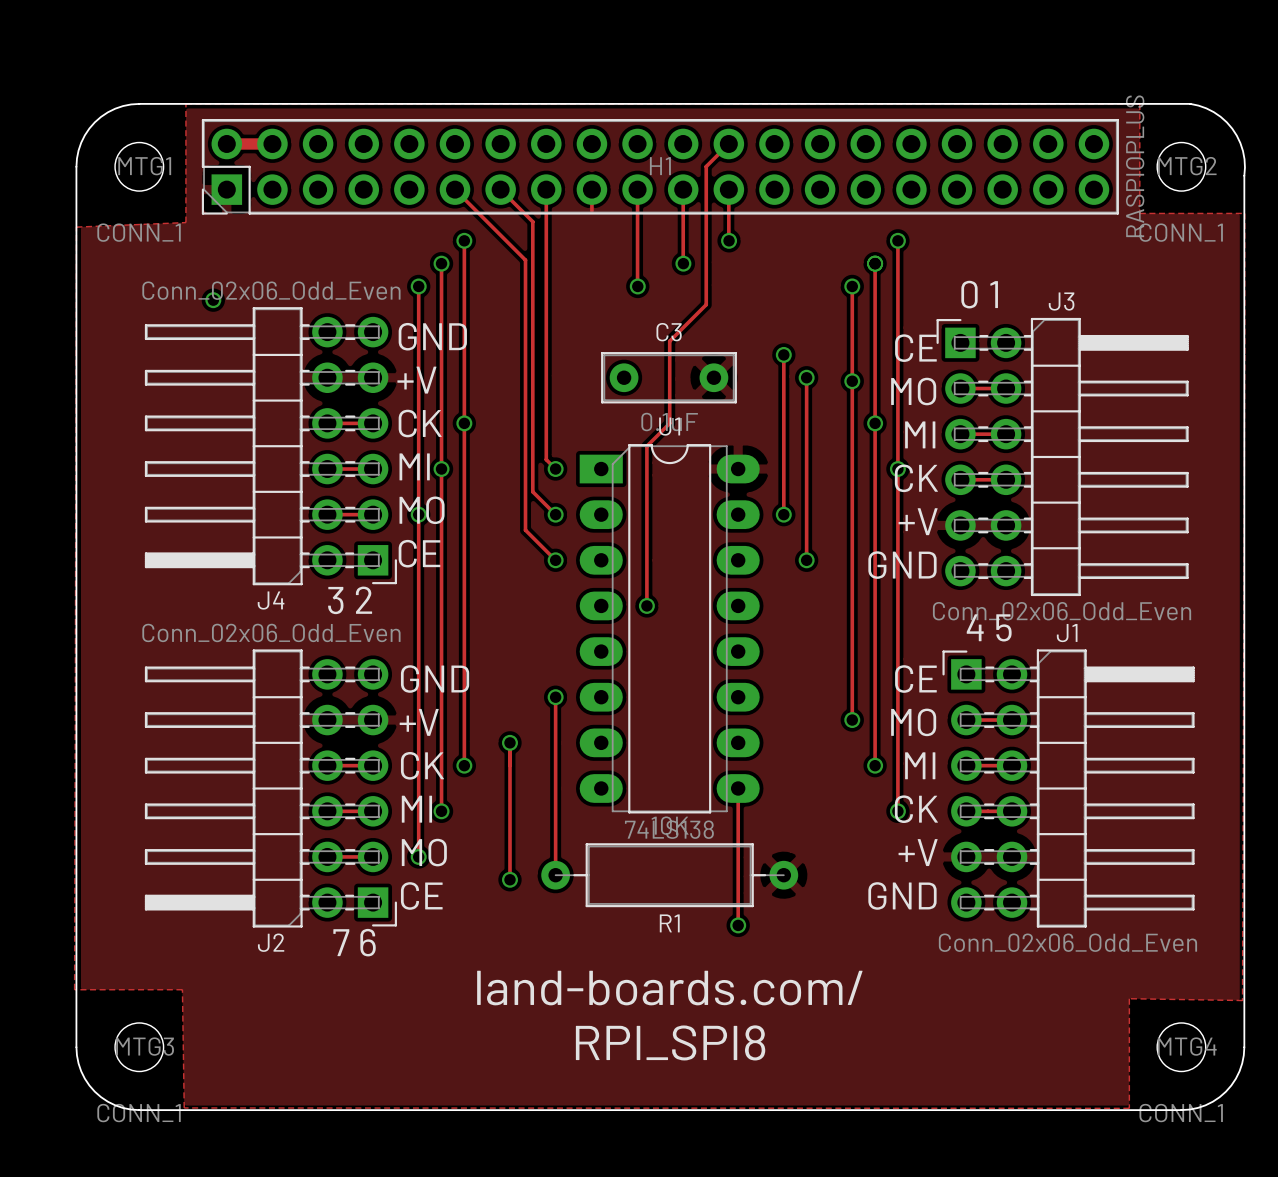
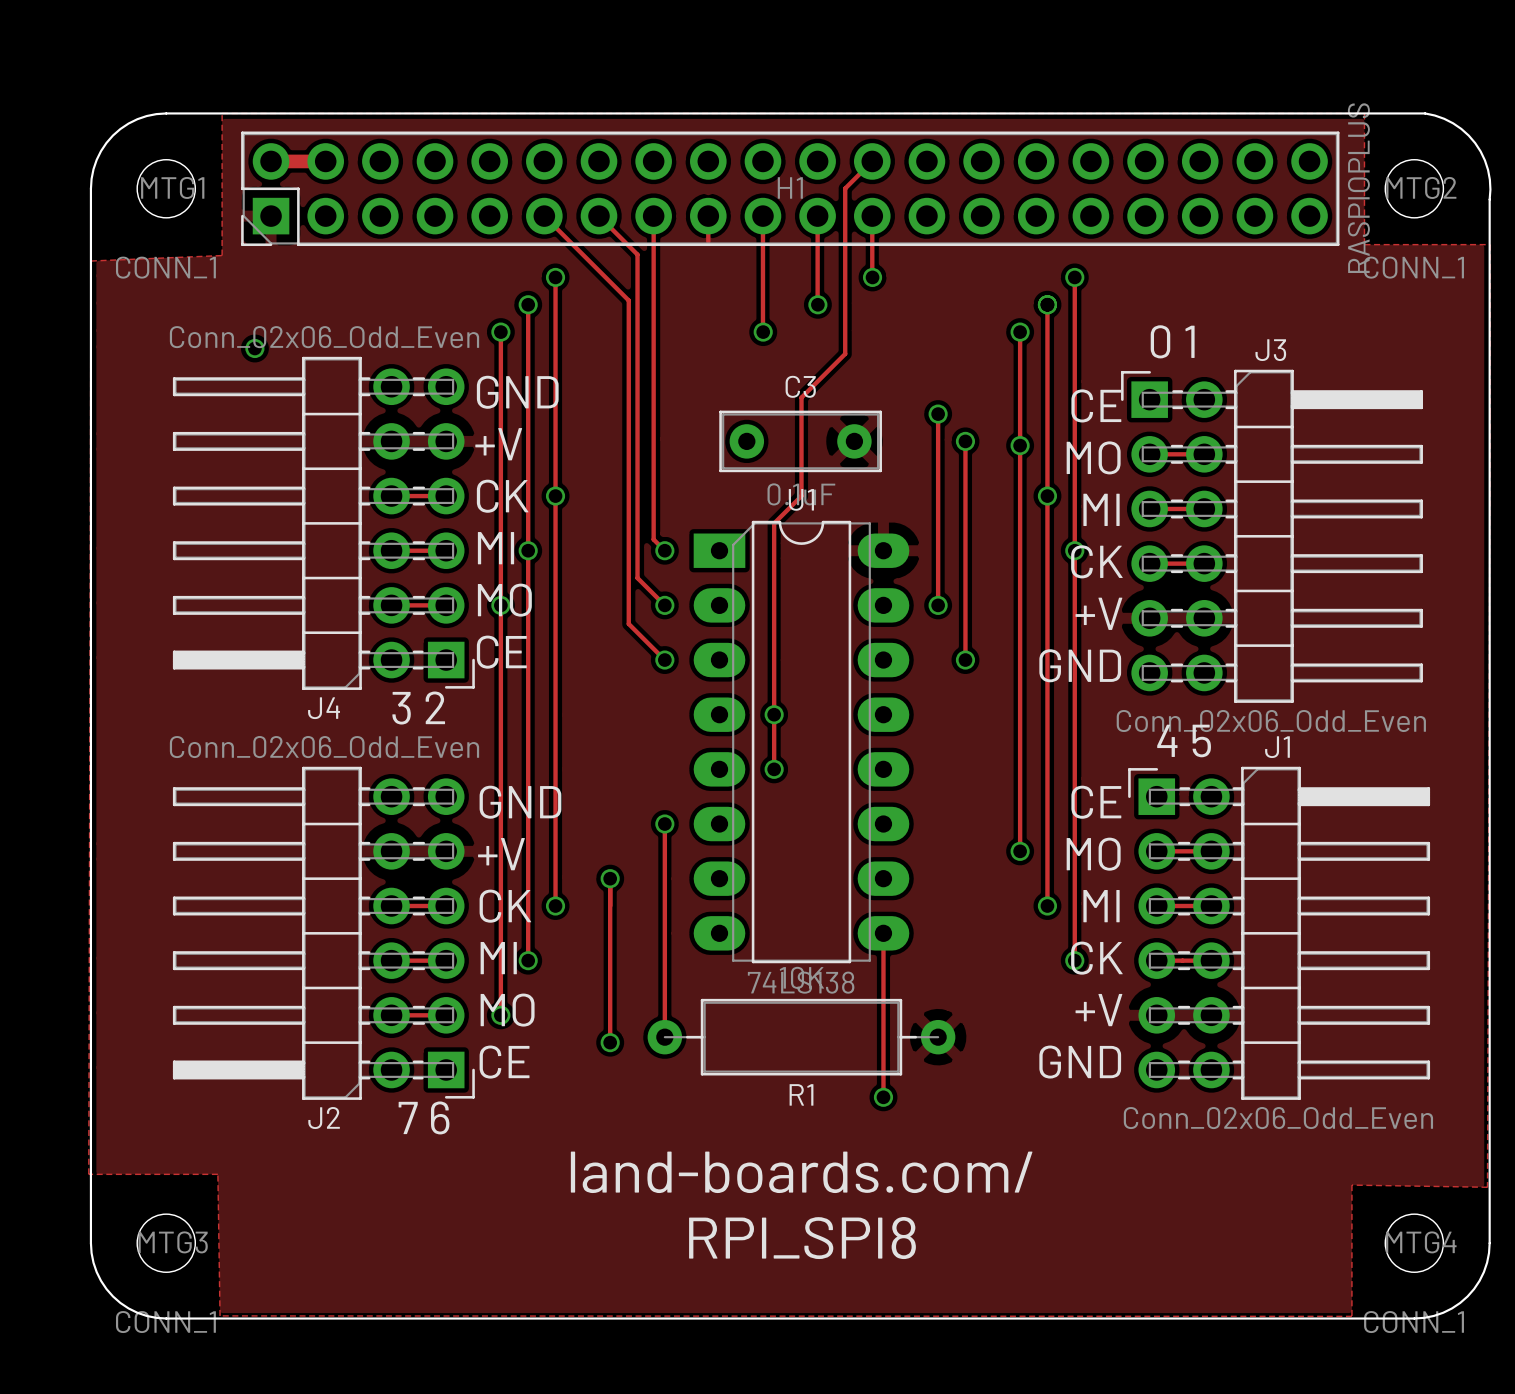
track: none -> (774, 714) (774, 769)
via: none -> (774, 769)

